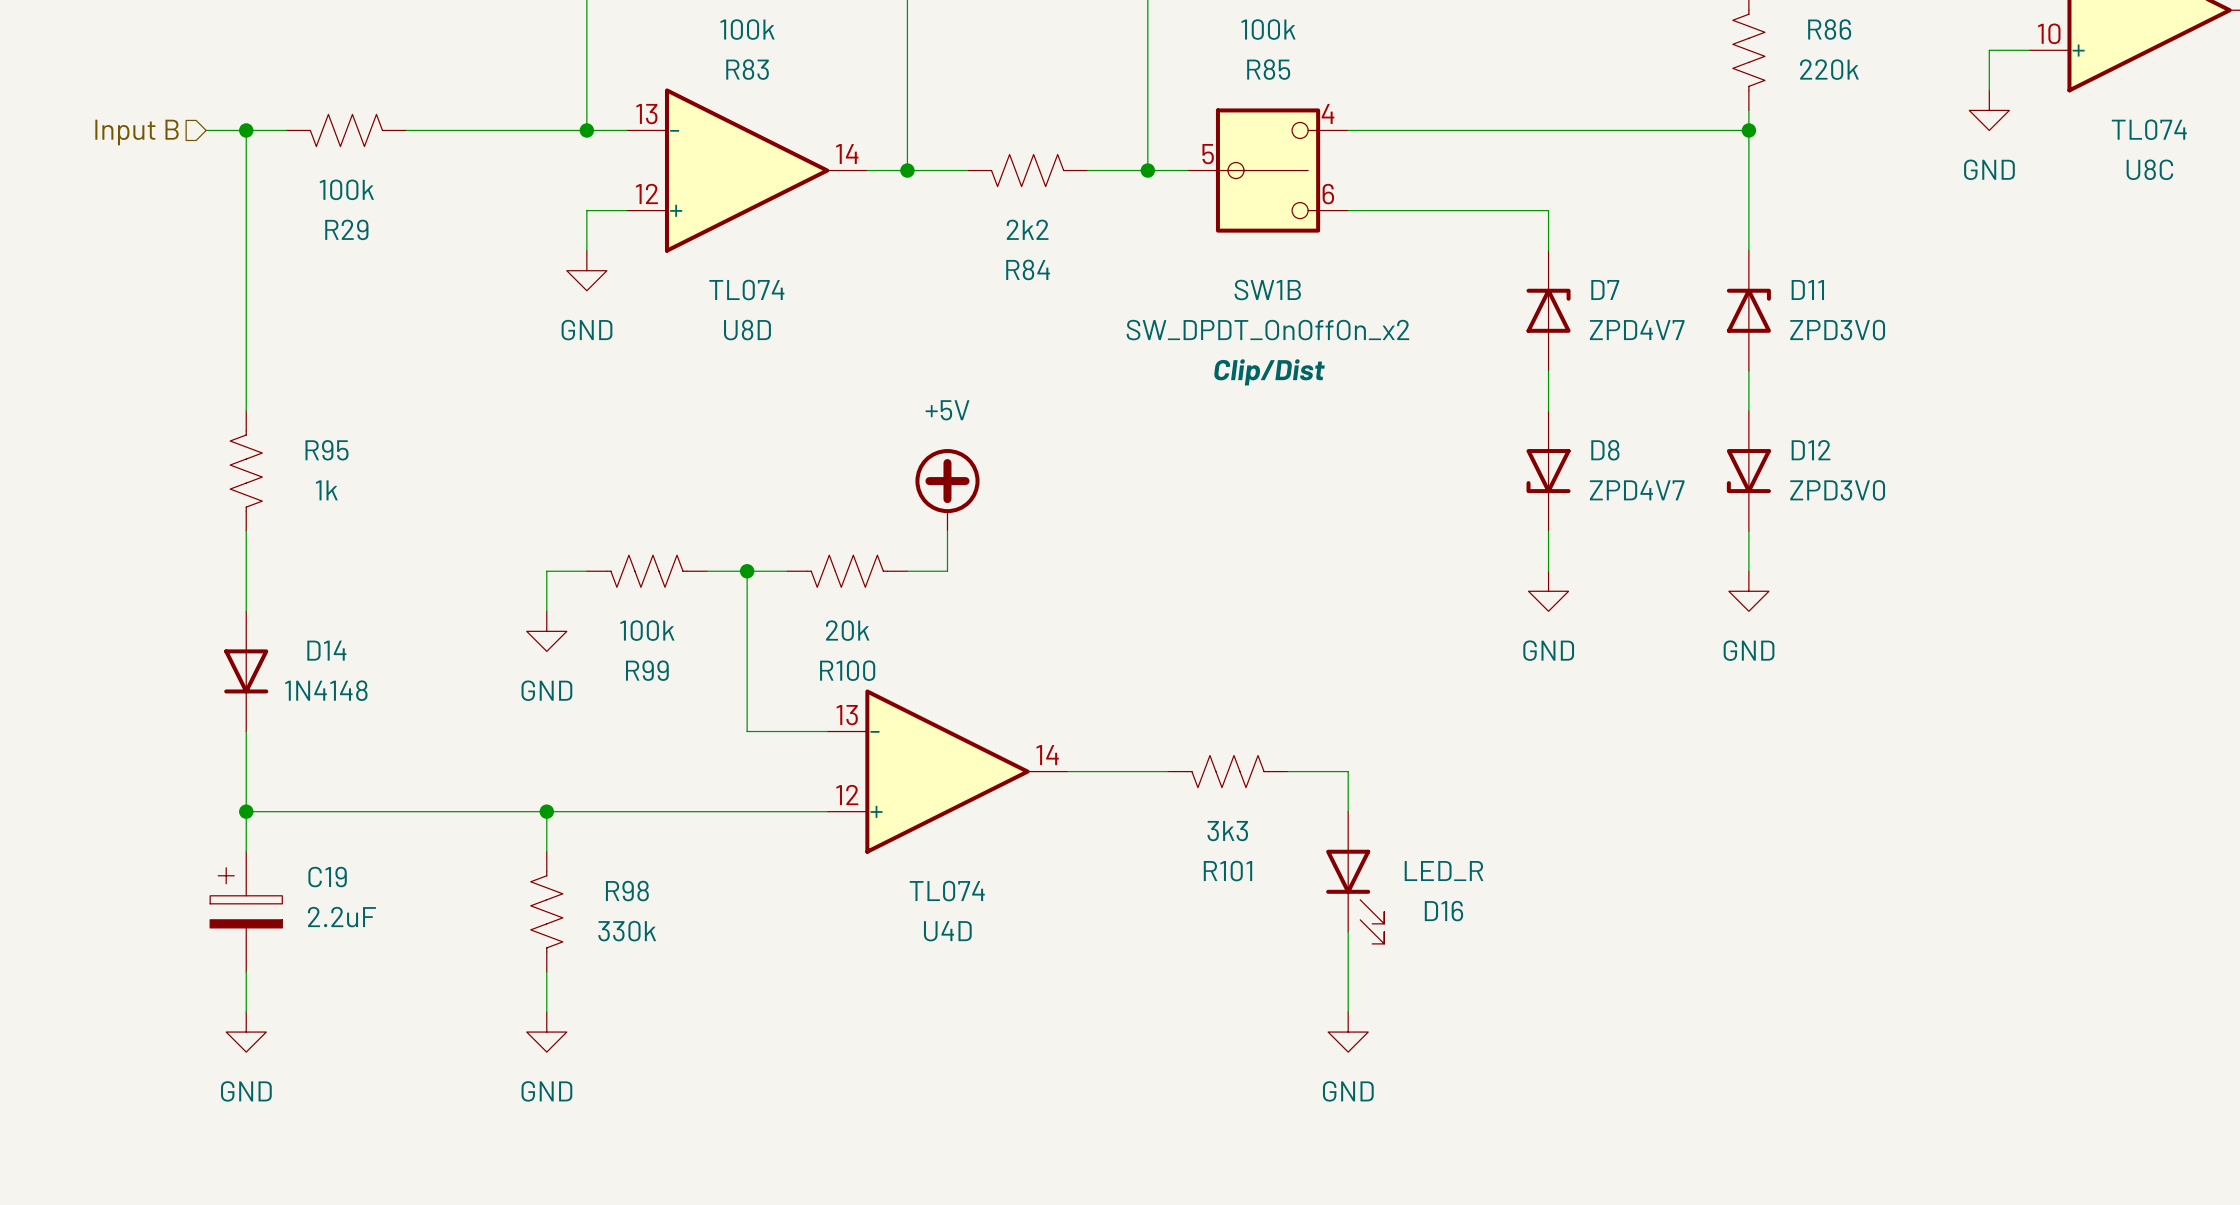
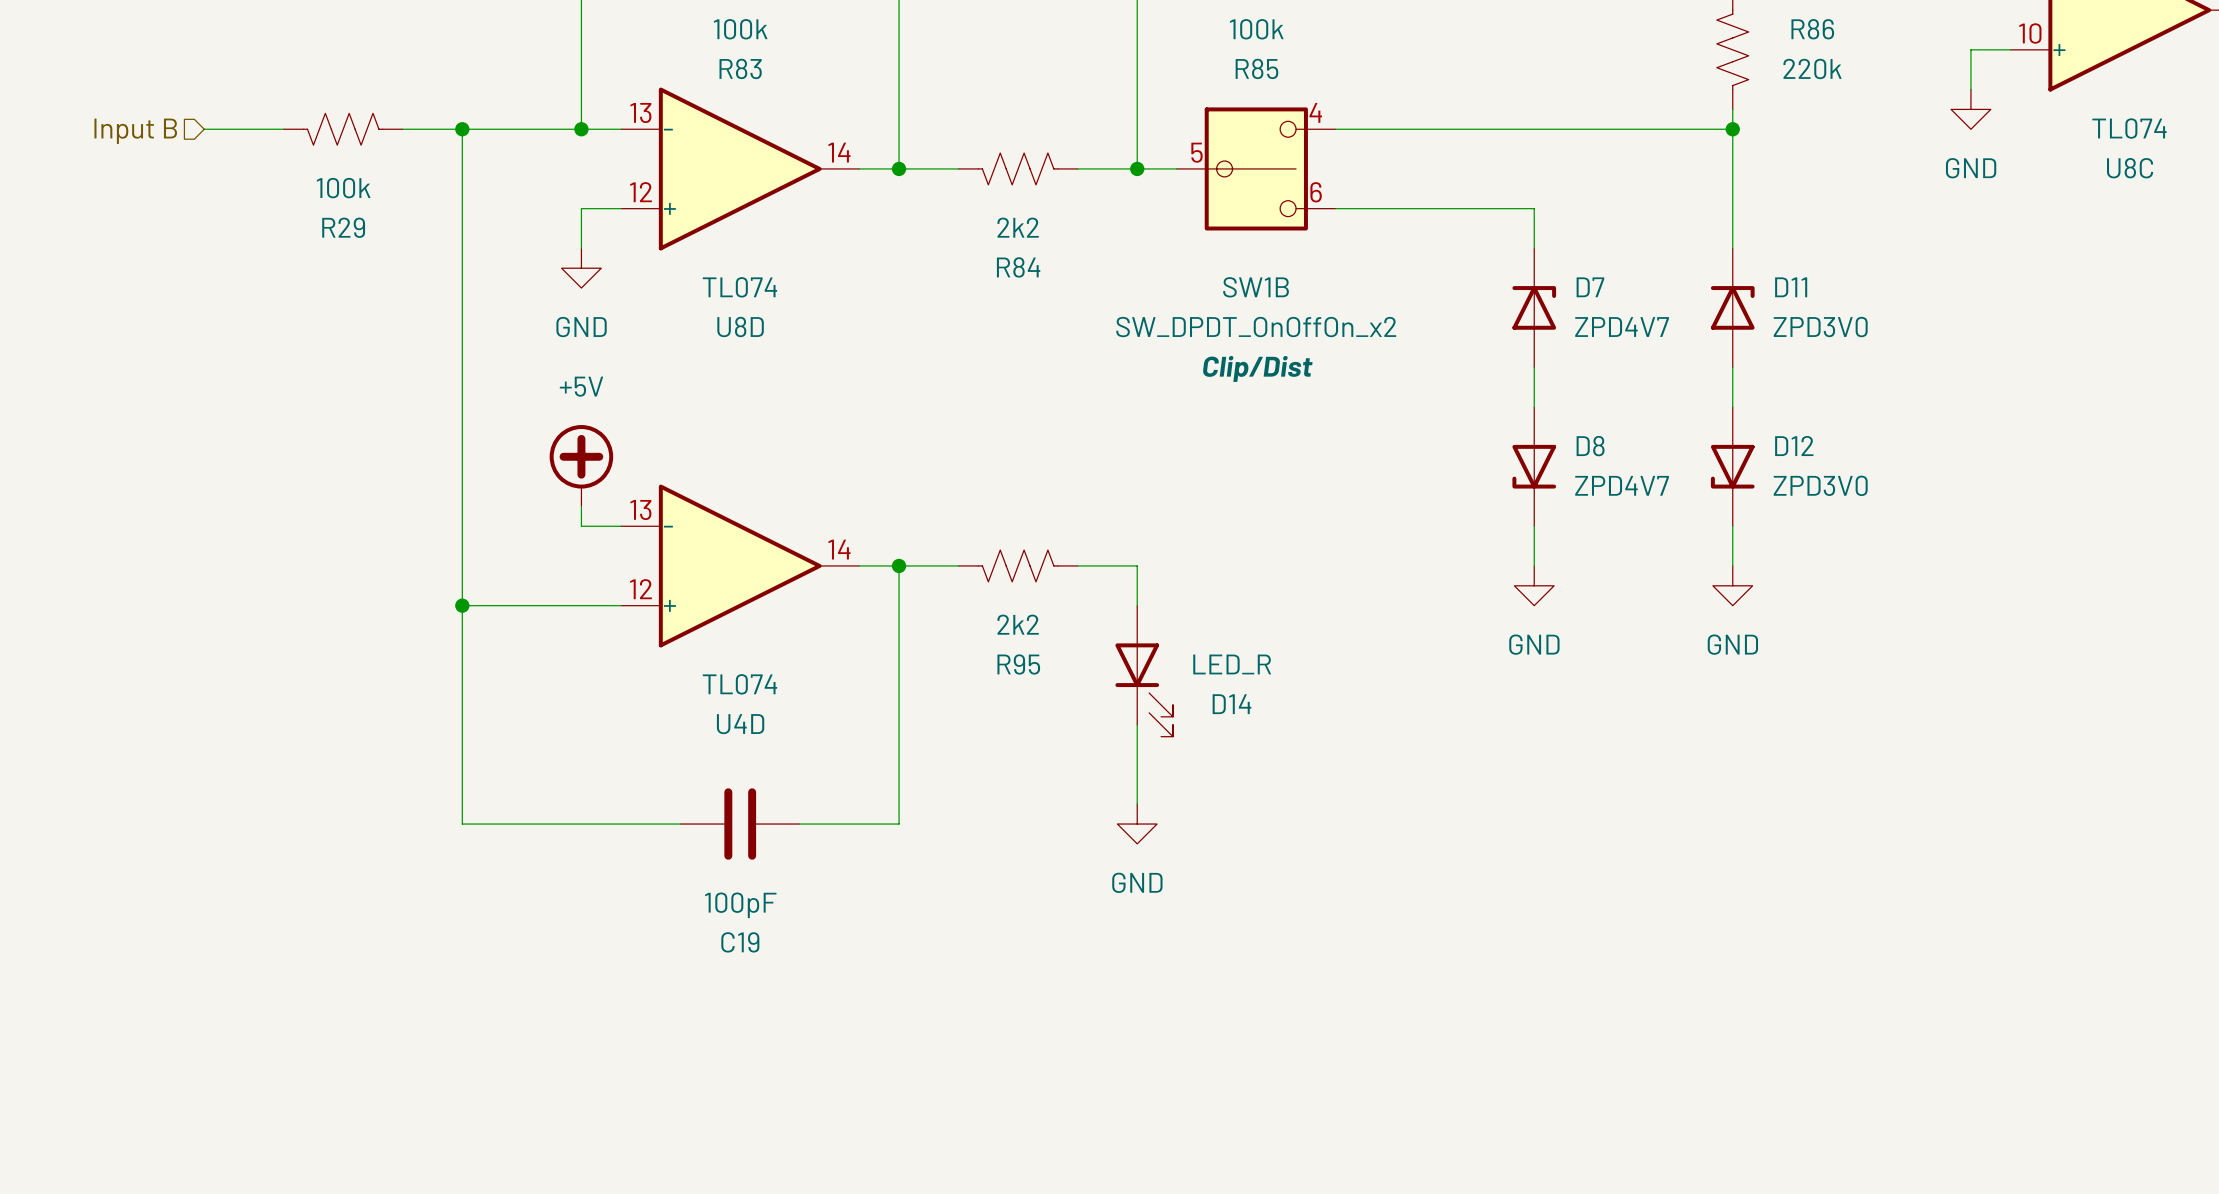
wire: (246, 130) (246, 410) -> none
junction: (246, 130) -> none
wire: none -> (462, 129) (462, 824) (680, 824)
junction: none -> (462, 129)
R95 rotation: 0° (246, 471) -> 90° clockwise (1018, 565)
R95 position: (246, 471) -> (1018, 565)
R95 value: 1k (326, 490) -> 2k2 (1018, 624)
power symbol position: +5V (947, 490) -> +5V (581, 465)
wire: none -> (581, 506) (581, 526) (621, 526)
wire: (246, 531) (246, 611) -> none
wire: (947, 531) (947, 571) -> (958, 565) (938, 565)
wire: (586, 571) (546, 571) (546, 611) -> none
R99: 100k (646, 571) -> none
wire: (747, 571) (747, 731) (827, 731) -> none
junction: (747, 571) -> none
R100: 20k (847, 571) -> none
wire: none -> (859, 565) (899, 565) (899, 824) (799, 824)
junction: none -> (899, 565)
D14 symbol: [224, 611, 269, 732] -> [1115, 605, 1173, 737]
wire: none -> (462, 605) (621, 605)
junction: none -> (462, 605)
power symbol: GND (546, 631) -> none
D14 name position: D14 (326, 650) -> D14 (1232, 704)
D14 value: 1N4148 (326, 690) -> LED_R (1232, 664)
wire: (246, 731) (246, 851) -> none
U4D position: (947, 771) -> (740, 565)
wire: (1067, 771) (1167, 771) -> none
R101: 3k3 (1227, 771) -> none
wire: (1288, 771) (1348, 771) (1348, 811) -> (1077, 565) (1137, 565) (1137, 605)
wire: (246, 811) (827, 811) -> none
junction: (246, 811) -> none
wire: (546, 811) (546, 851) -> none
junction: (546, 811) -> none
C19 symbol: [210, 851, 283, 972] -> [680, 788, 800, 860]
C19 name position: C19 (327, 877) -> C19 (740, 942)
D16: LED_R (1355, 877) -> none
R98: 330k (546, 911) -> none
C19 value: 2.2uF (341, 917) -> 100pF (740, 905)
wire: (1348, 931) (1348, 1012) -> (1137, 724) (1137, 804)
wire: (246, 971) (246, 1012) -> none
wire: (546, 971) (546, 1012) -> none
power symbol: GND (246, 1032) -> none
power symbol: GND (546, 1032) -> none
power symbol position: GND (1348, 1032) -> GND (1137, 824)

